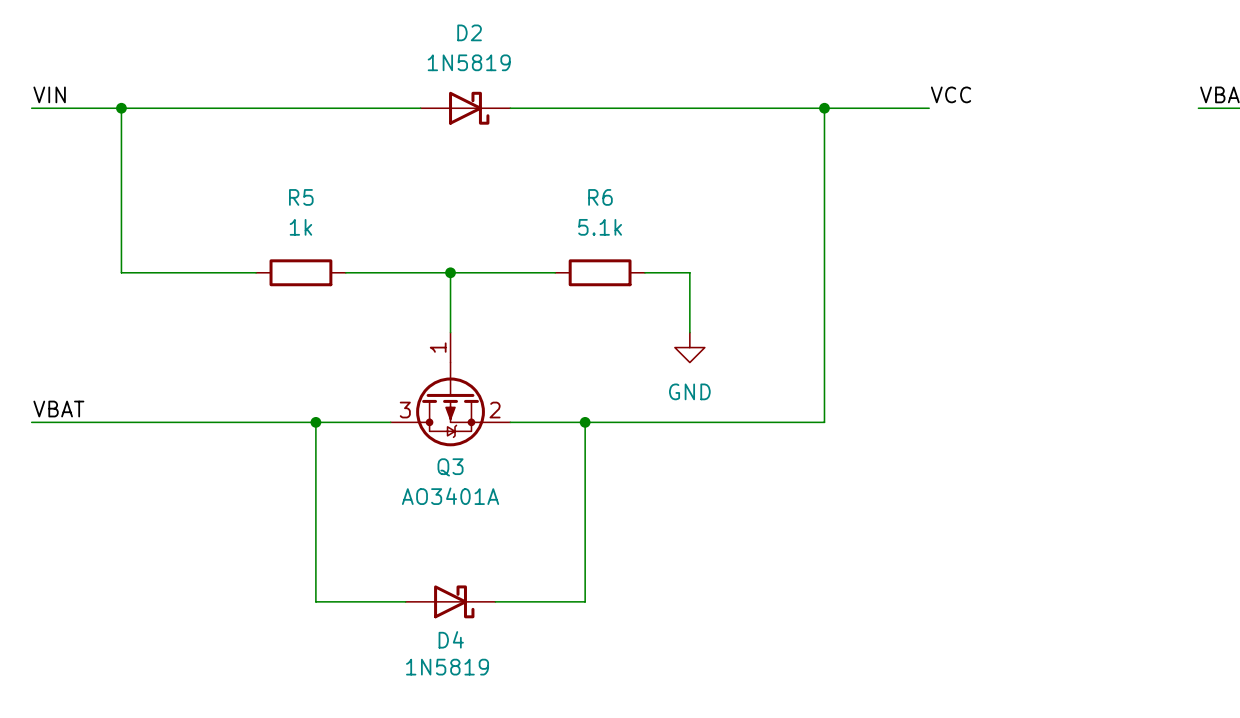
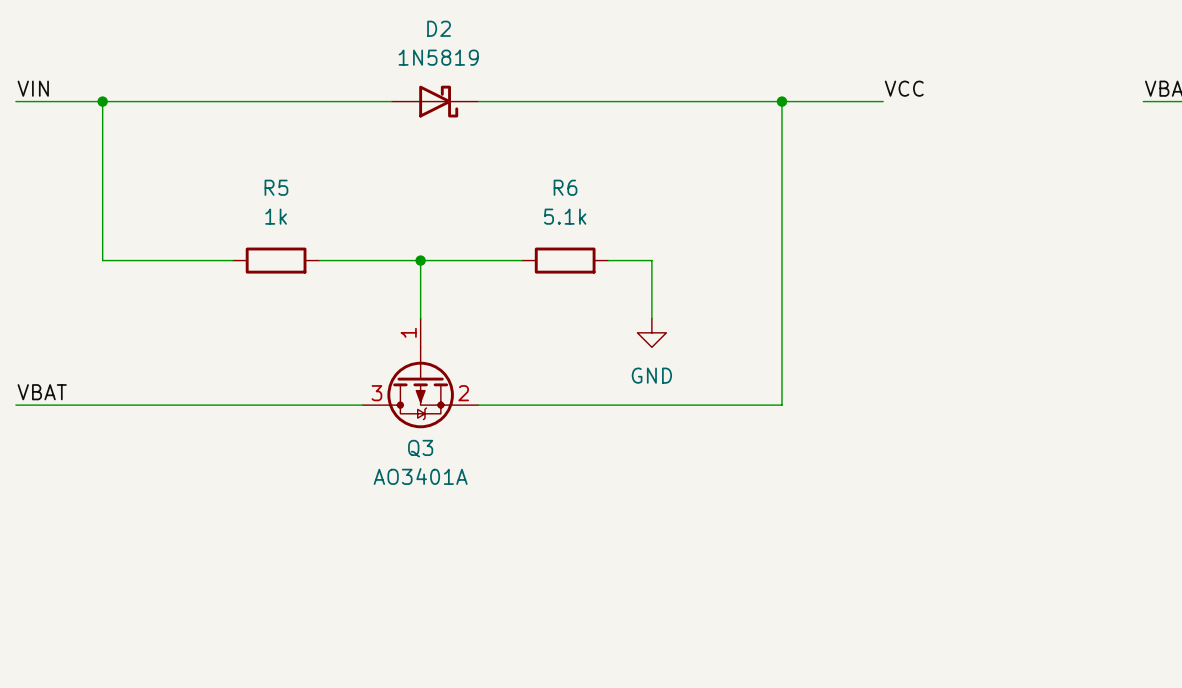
wire: (315, 422) (315, 601) (405, 601) -> none
junction: (315, 422) -> none
wire: (585, 422) (585, 601) (495, 601) -> none
junction: (585, 422) -> none
D4: 1N5819 (450, 601) -> none

